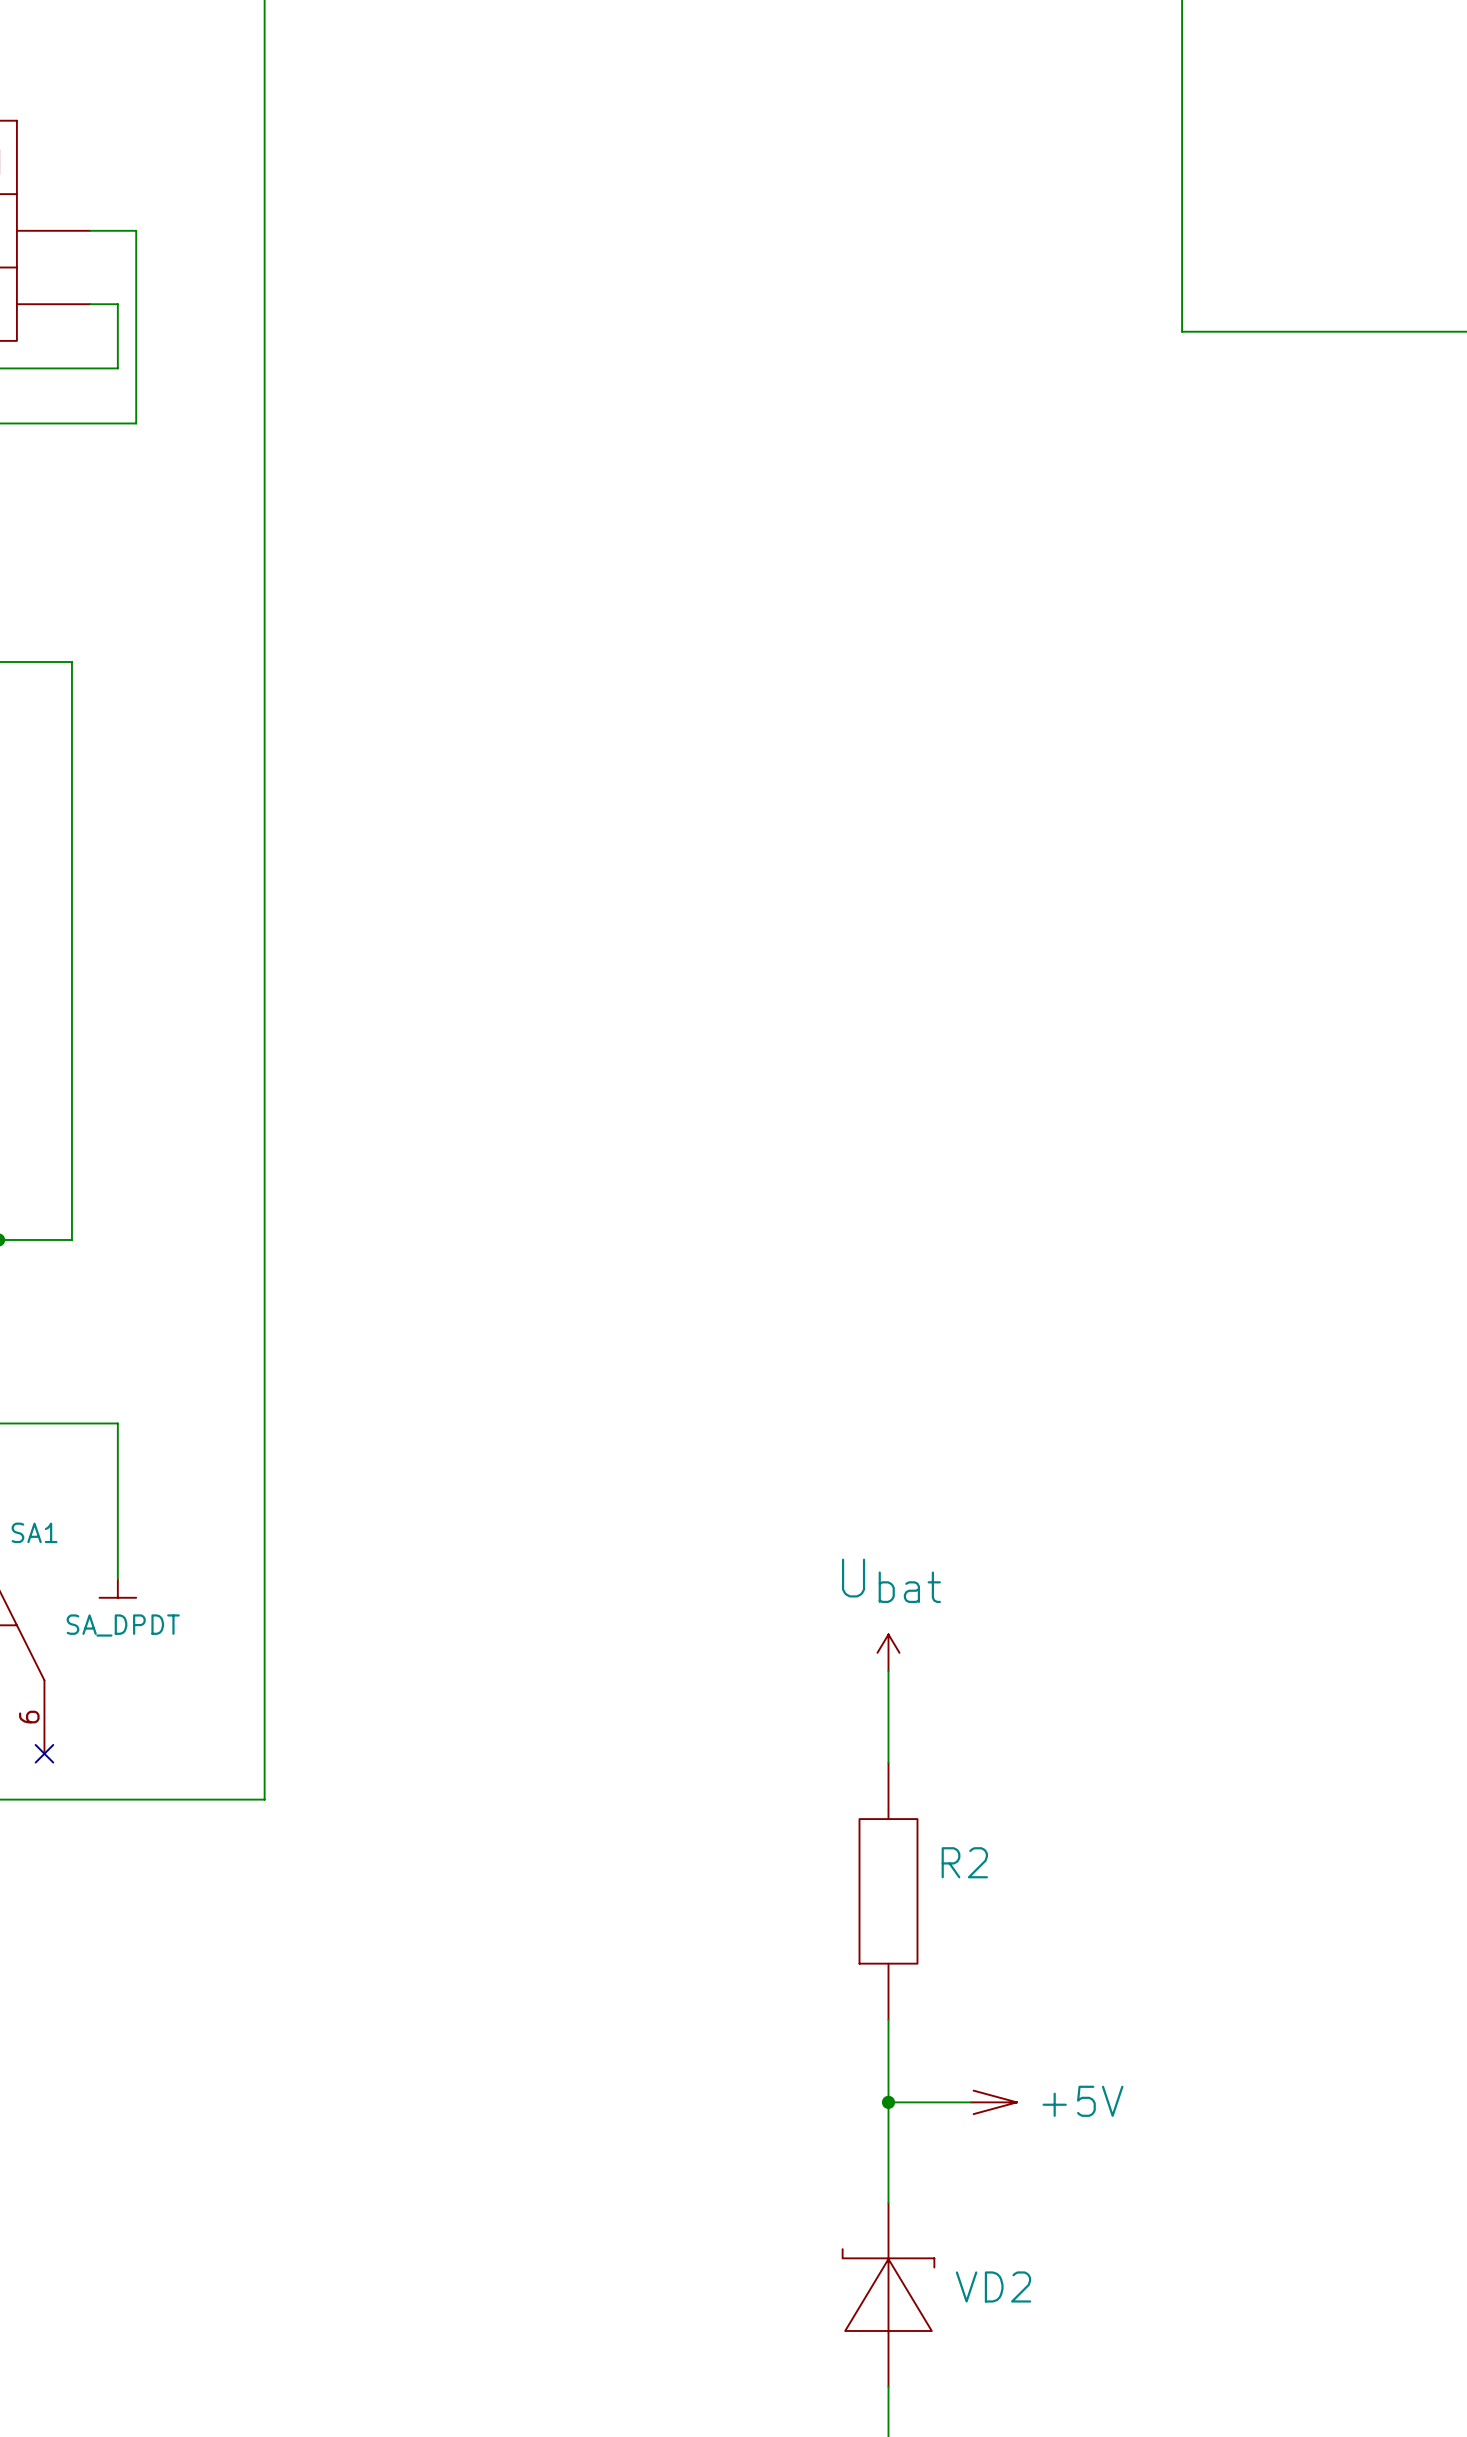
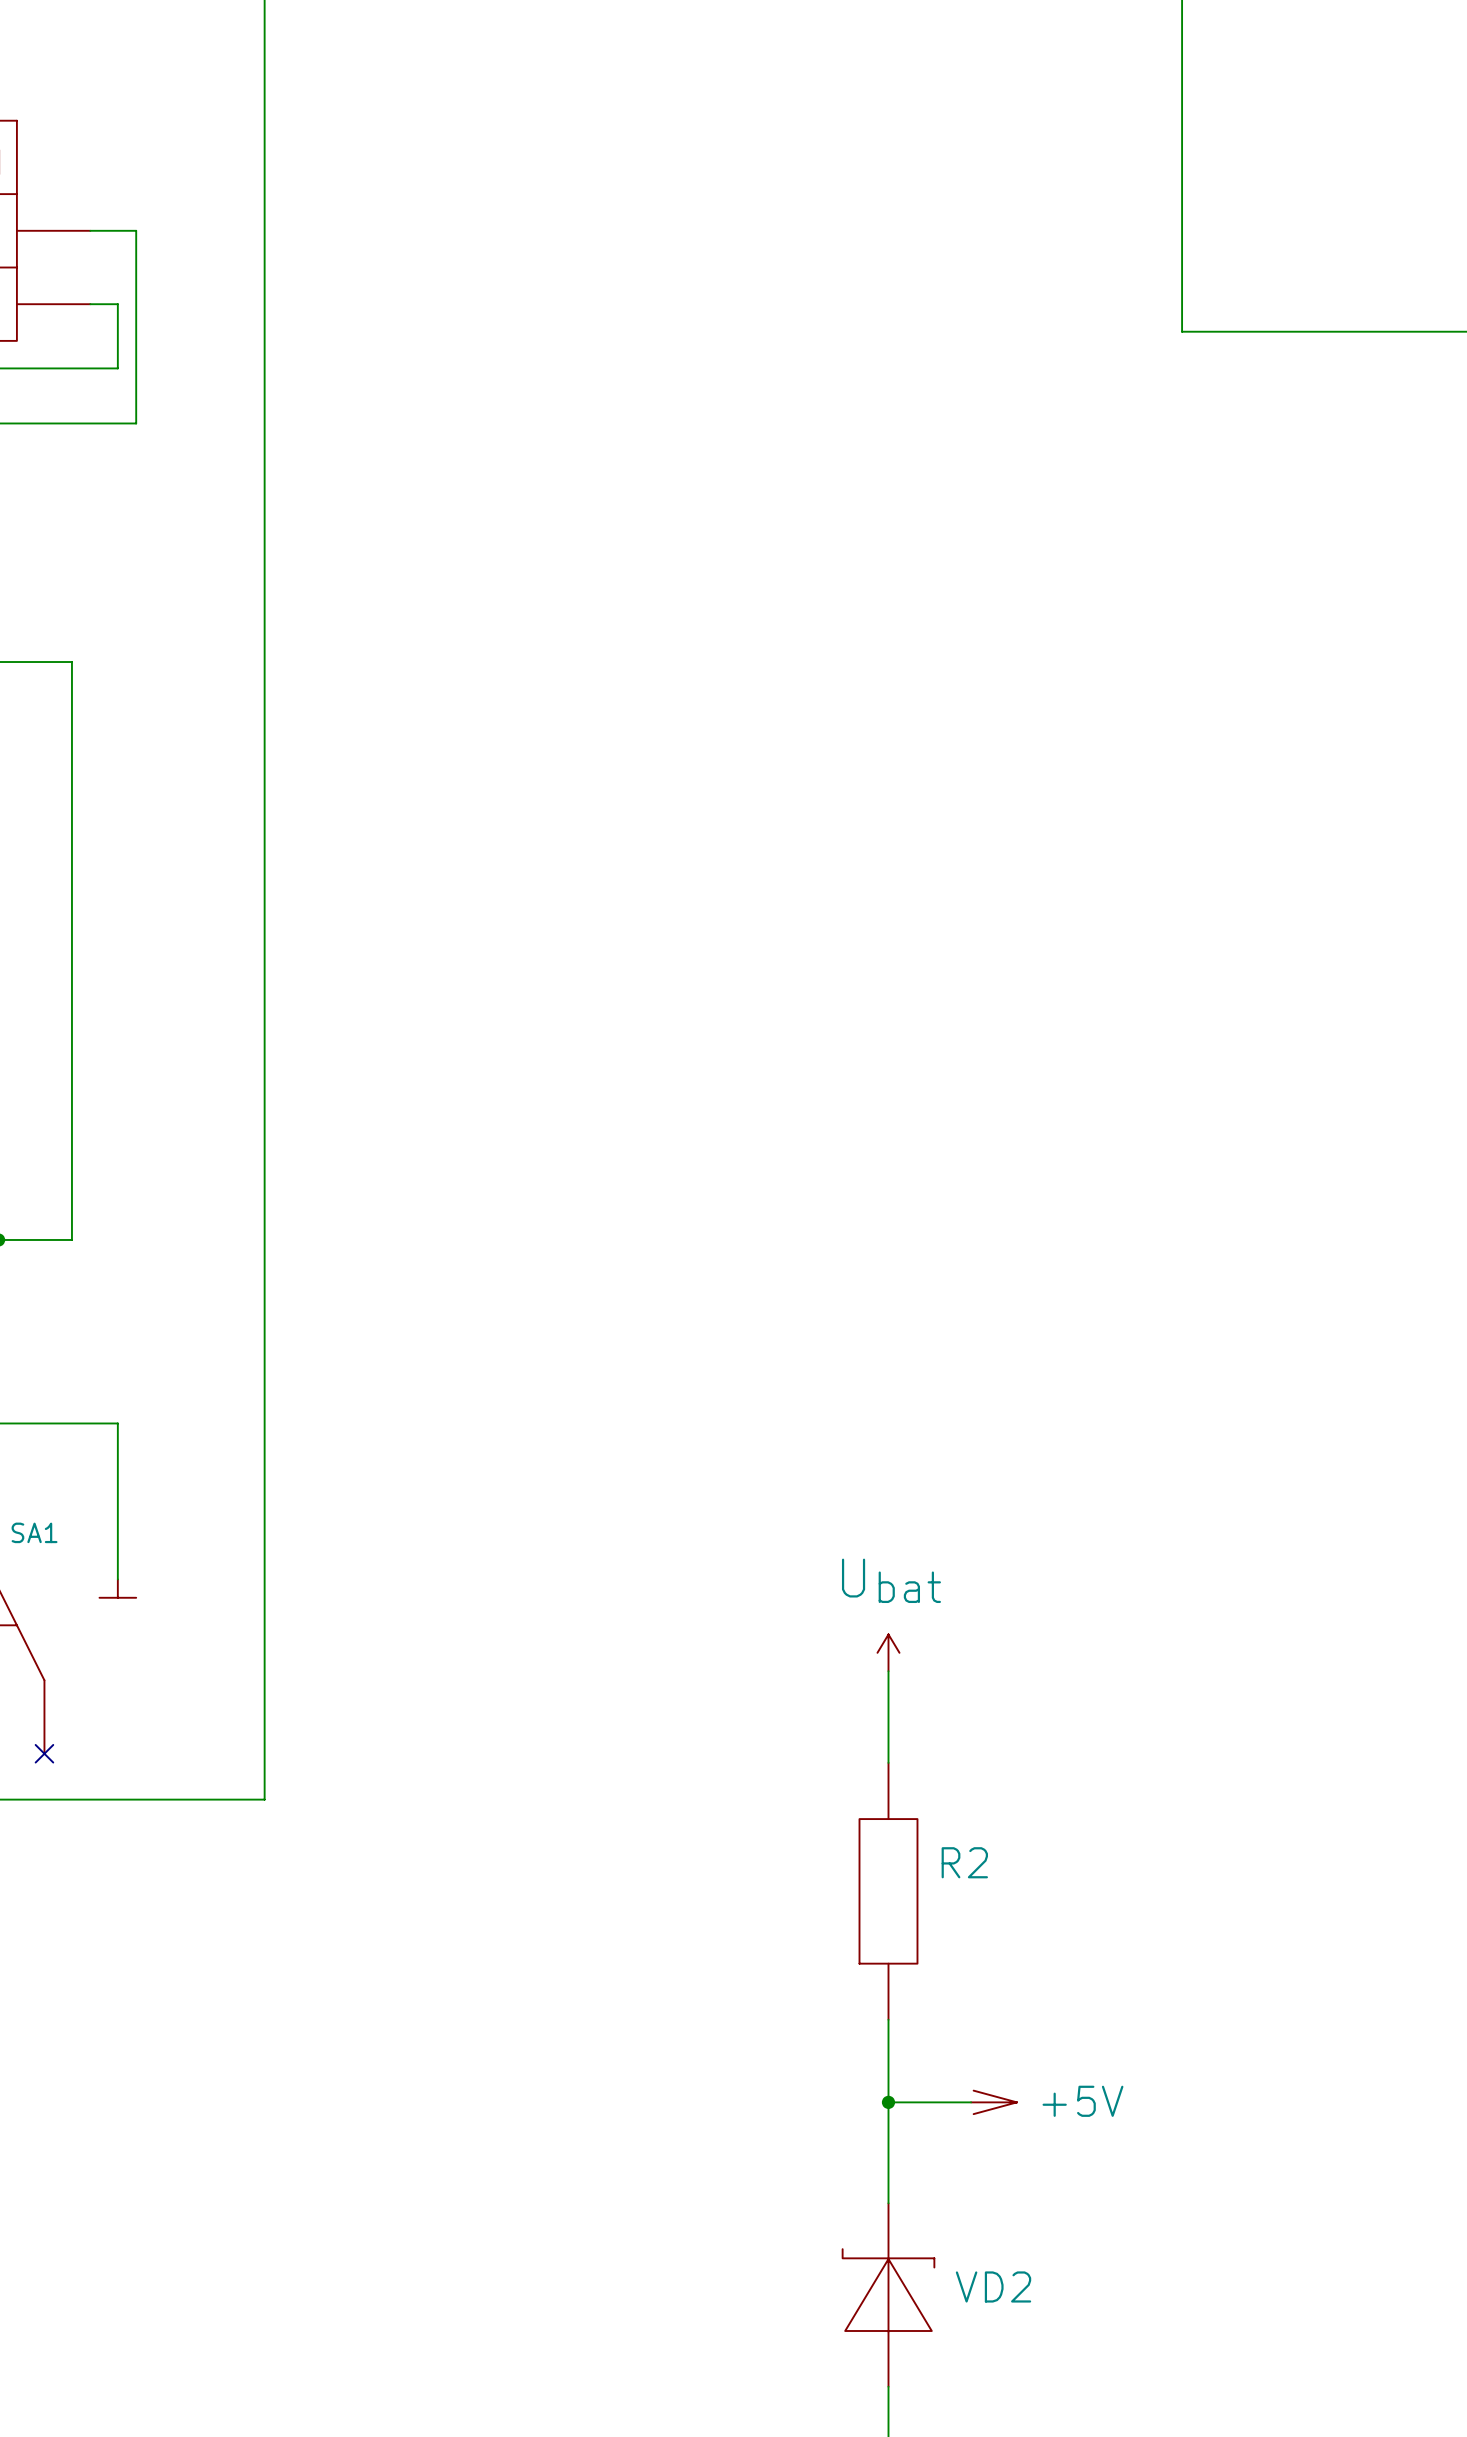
SA1 value: SA_DPDT (123, 1625) -> none
SA1 pin number: 6 (29, 1717) -> none

